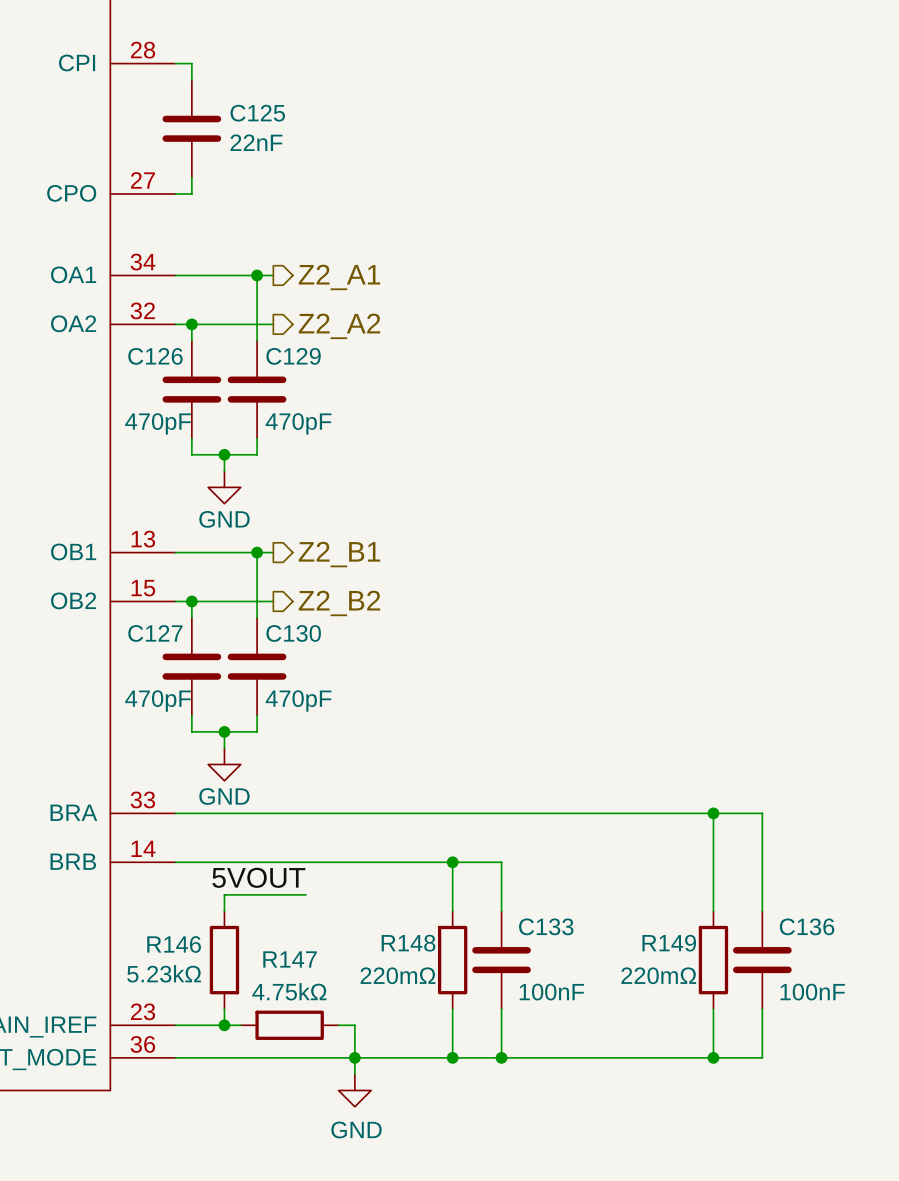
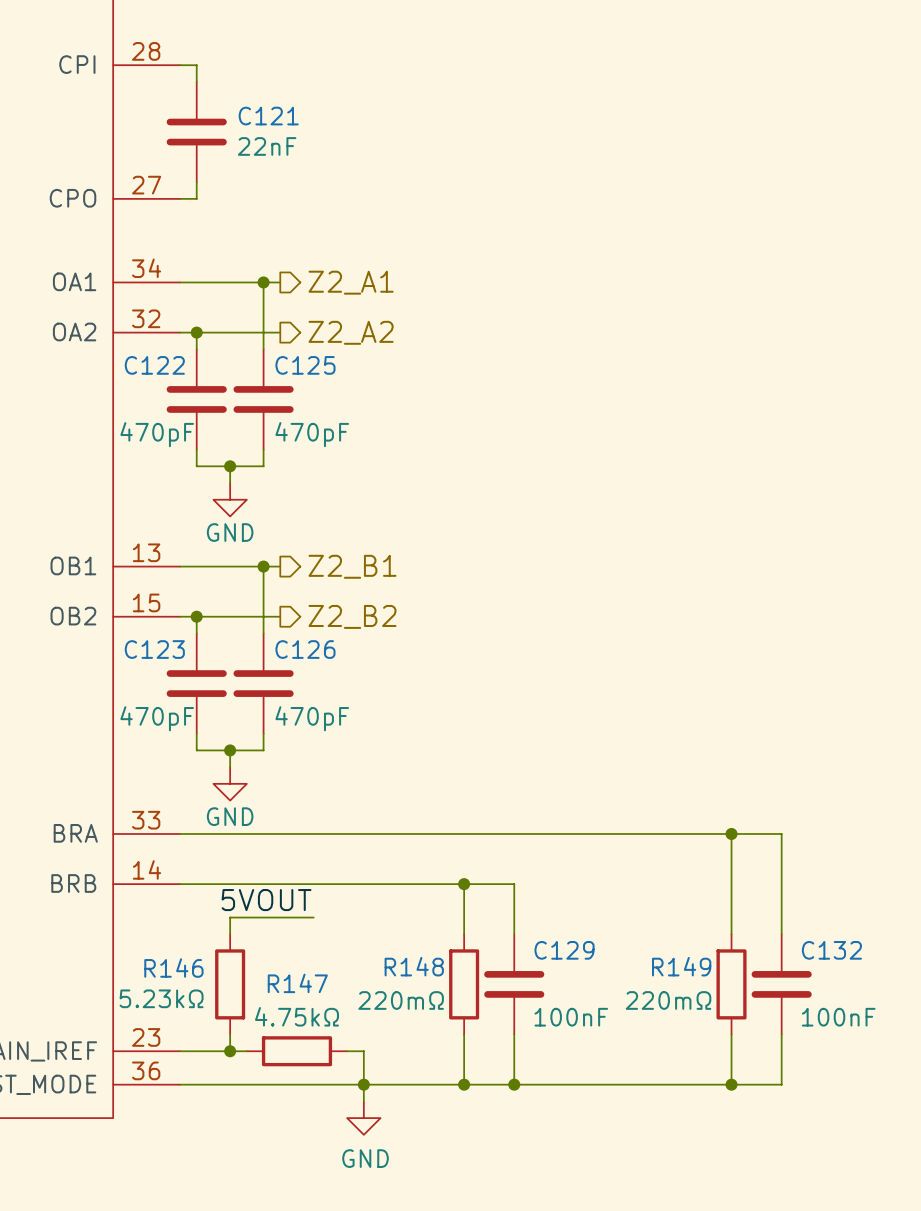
C125 name: C125 (257, 113) -> C121 (268, 116)
C126 name: C126 (155, 356) -> C122 (154, 365)
C129 name: C129 (293, 356) -> C125 (305, 365)
C127 name: C127 (155, 633) -> C123 (154, 649)
C130 name: C130 (293, 633) -> C126 (305, 649)
C133 name: C133 (546, 926) -> C129 (564, 950)
C136 name: C136 (807, 926) -> C132 (831, 950)

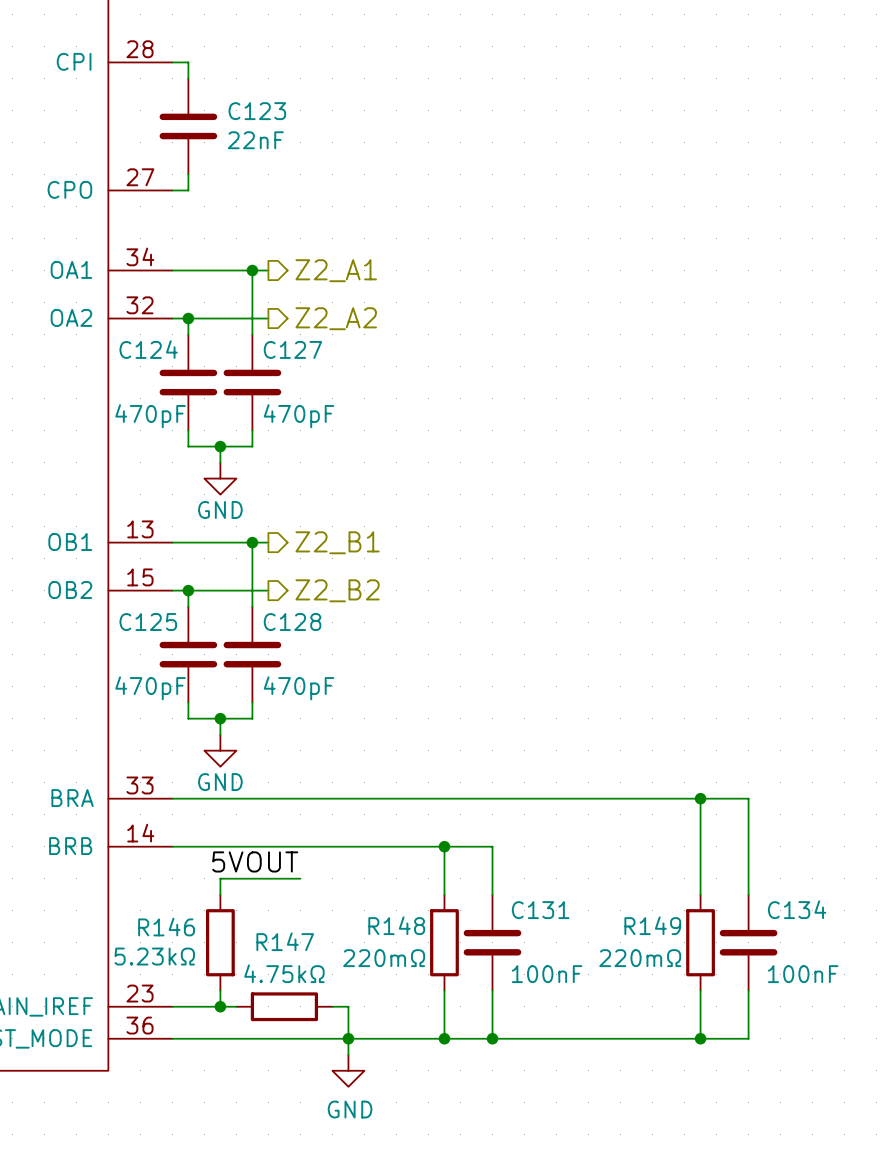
C121 name: C121 (268, 116) -> C123 (257, 111)
C122 name: C122 (154, 365) -> C124 (148, 349)
C125 name: C125 (305, 365) -> C127 (292, 349)
C123 name: C123 (154, 649) -> C125 (148, 622)
C126 name: C126 (305, 649) -> C128 (292, 622)
C129 name: C129 (564, 950) -> C131 (540, 910)
C132 name: C132 (831, 950) -> C134 (797, 909)

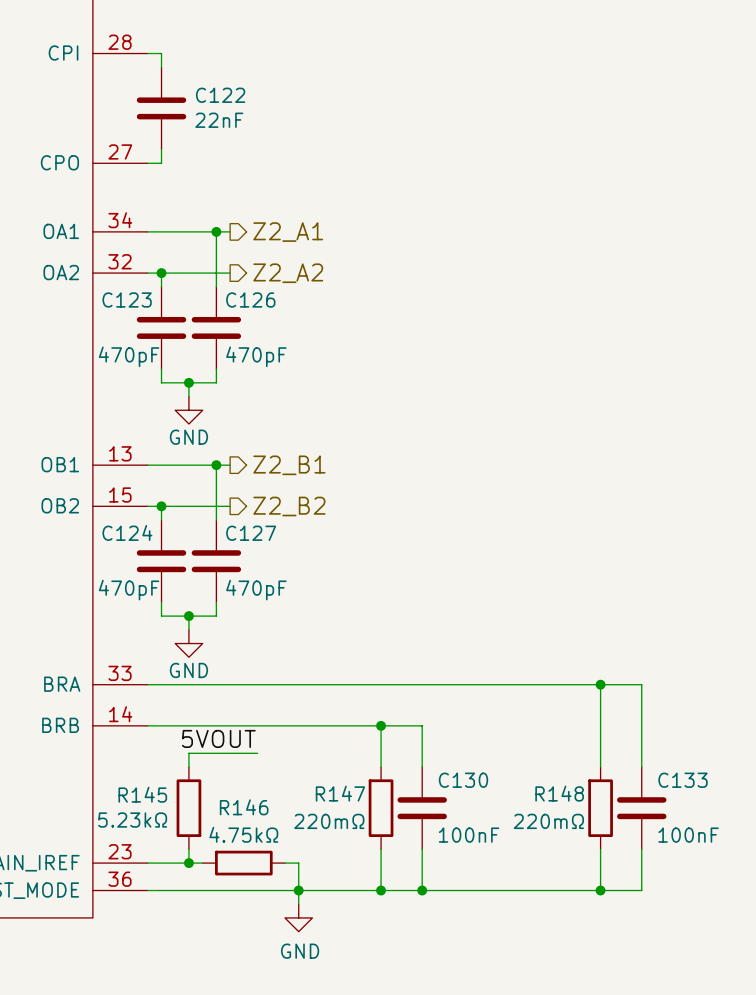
C123 name: C123 (257, 111) -> C122 (220, 95)
C124 name: C124 (148, 349) -> C123 (127, 299)
C127 name: C127 (292, 349) -> C126 (250, 299)
C125 name: C125 (148, 622) -> C124 (127, 532)
C128 name: C128 (292, 622) -> C127 (251, 533)
C134 name: C134 (797, 909) -> C133 (683, 780)
C131 name: C131 (540, 910) -> C130 (463, 780)
R148 name: R148 (396, 925) -> R147 (340, 793)
R149 name: R149 (652, 925) -> R148 (559, 793)
R146 name: R146 (166, 927) -> R145 (142, 794)
R147 name: R147 (285, 941) -> R146 (244, 807)

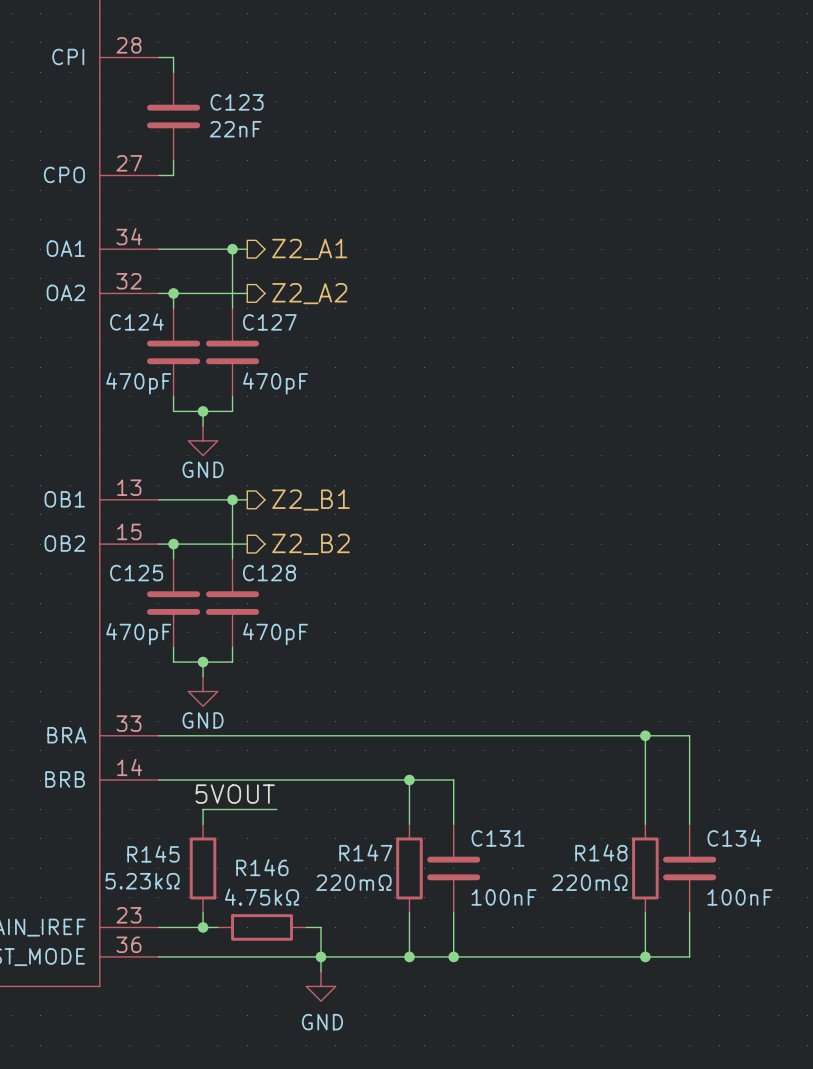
C122 name: C122 (220, 95) -> C123 (237, 102)
C123 name: C123 (127, 299) -> C124 (136, 322)
C126 name: C126 (250, 299) -> C127 (269, 322)
C124 name: C124 (127, 532) -> C125 (136, 573)
C127 name: C127 (251, 533) -> C128 (269, 573)
C130 name: C130 (463, 780) -> C131 (498, 838)
C133 name: C133 (683, 780) -> C134 (734, 838)

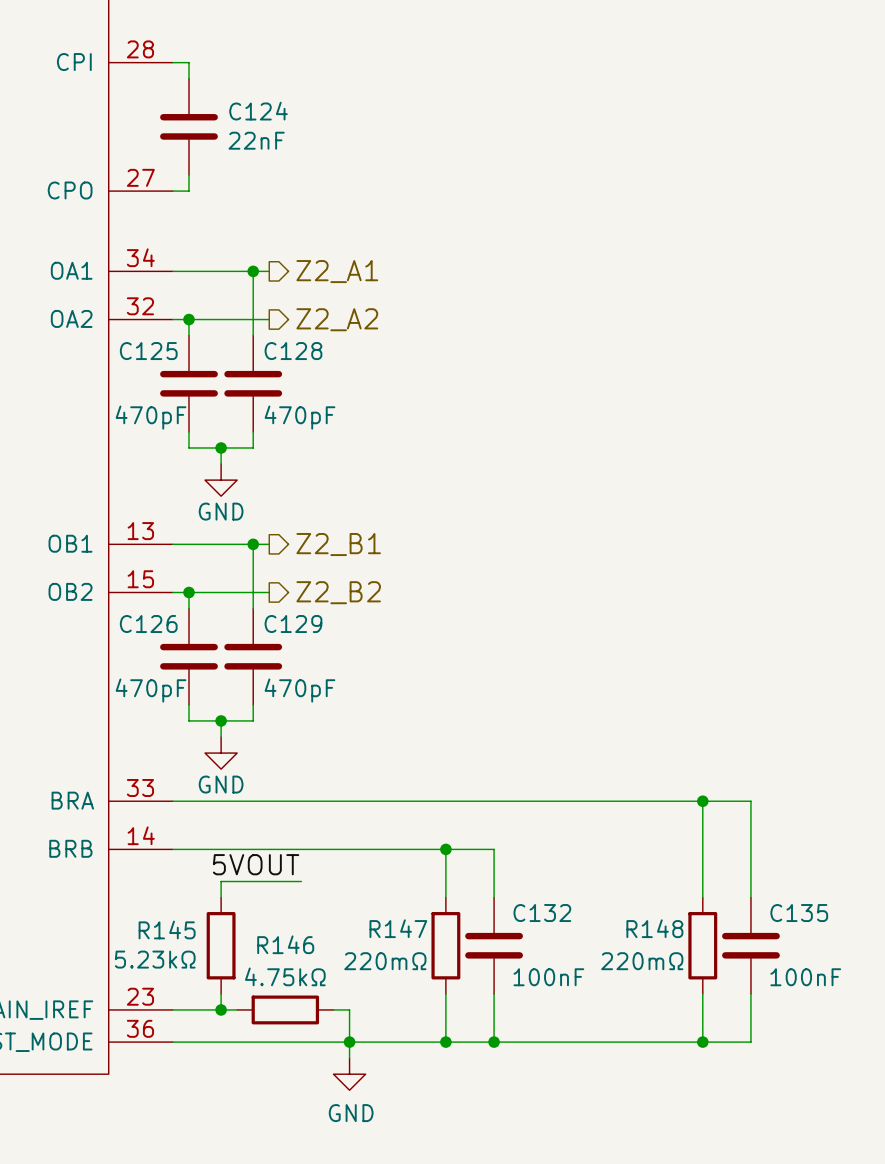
C123 name: C123 (237, 102) -> C124 (258, 111)
C124 name: C124 (136, 322) -> C125 (148, 351)
C127 name: C127 (269, 322) -> C128 (293, 351)
C125 name: C125 (136, 573) -> C126 (148, 624)
C128 name: C128 (269, 573) -> C129 (293, 624)
C131 name: C131 (498, 838) -> C132 (542, 913)
C134 name: C134 (734, 838) -> C135 (799, 913)

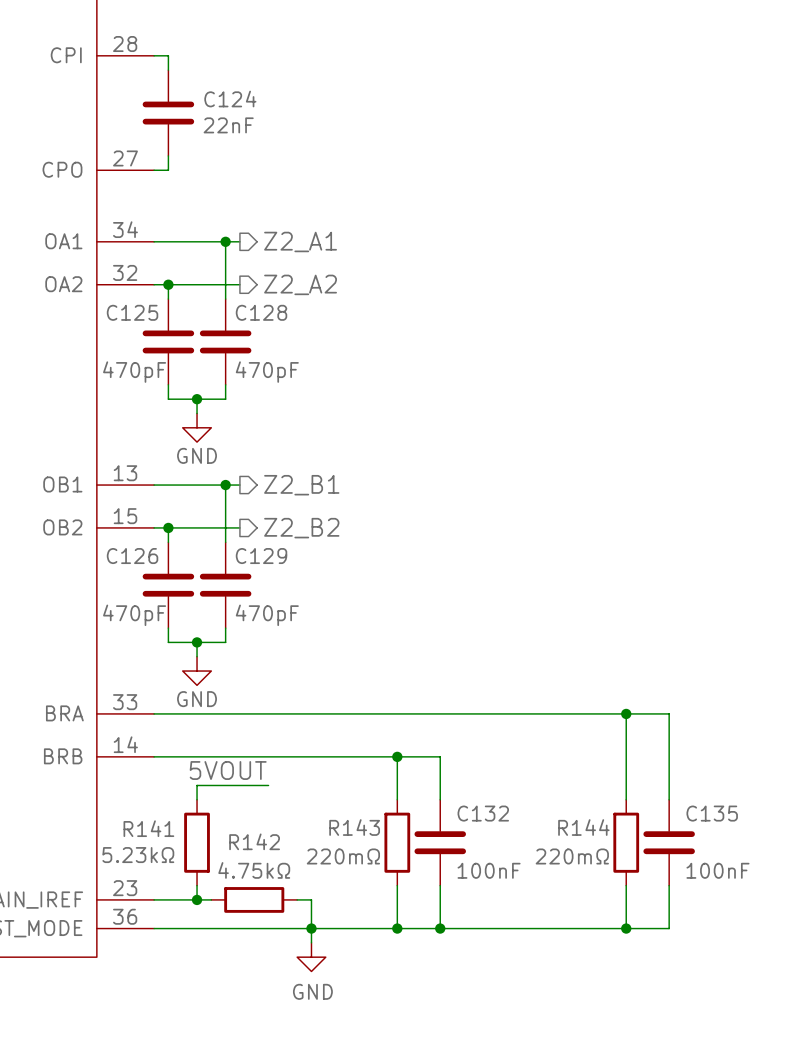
R147 name: R147 (398, 928) -> R143 (354, 827)
R148 name: R148 (654, 928) -> R144 (583, 827)
R145 name: R145 (167, 929) -> R141 (148, 828)
R146 name: R146 (285, 944) -> R142 (254, 841)

